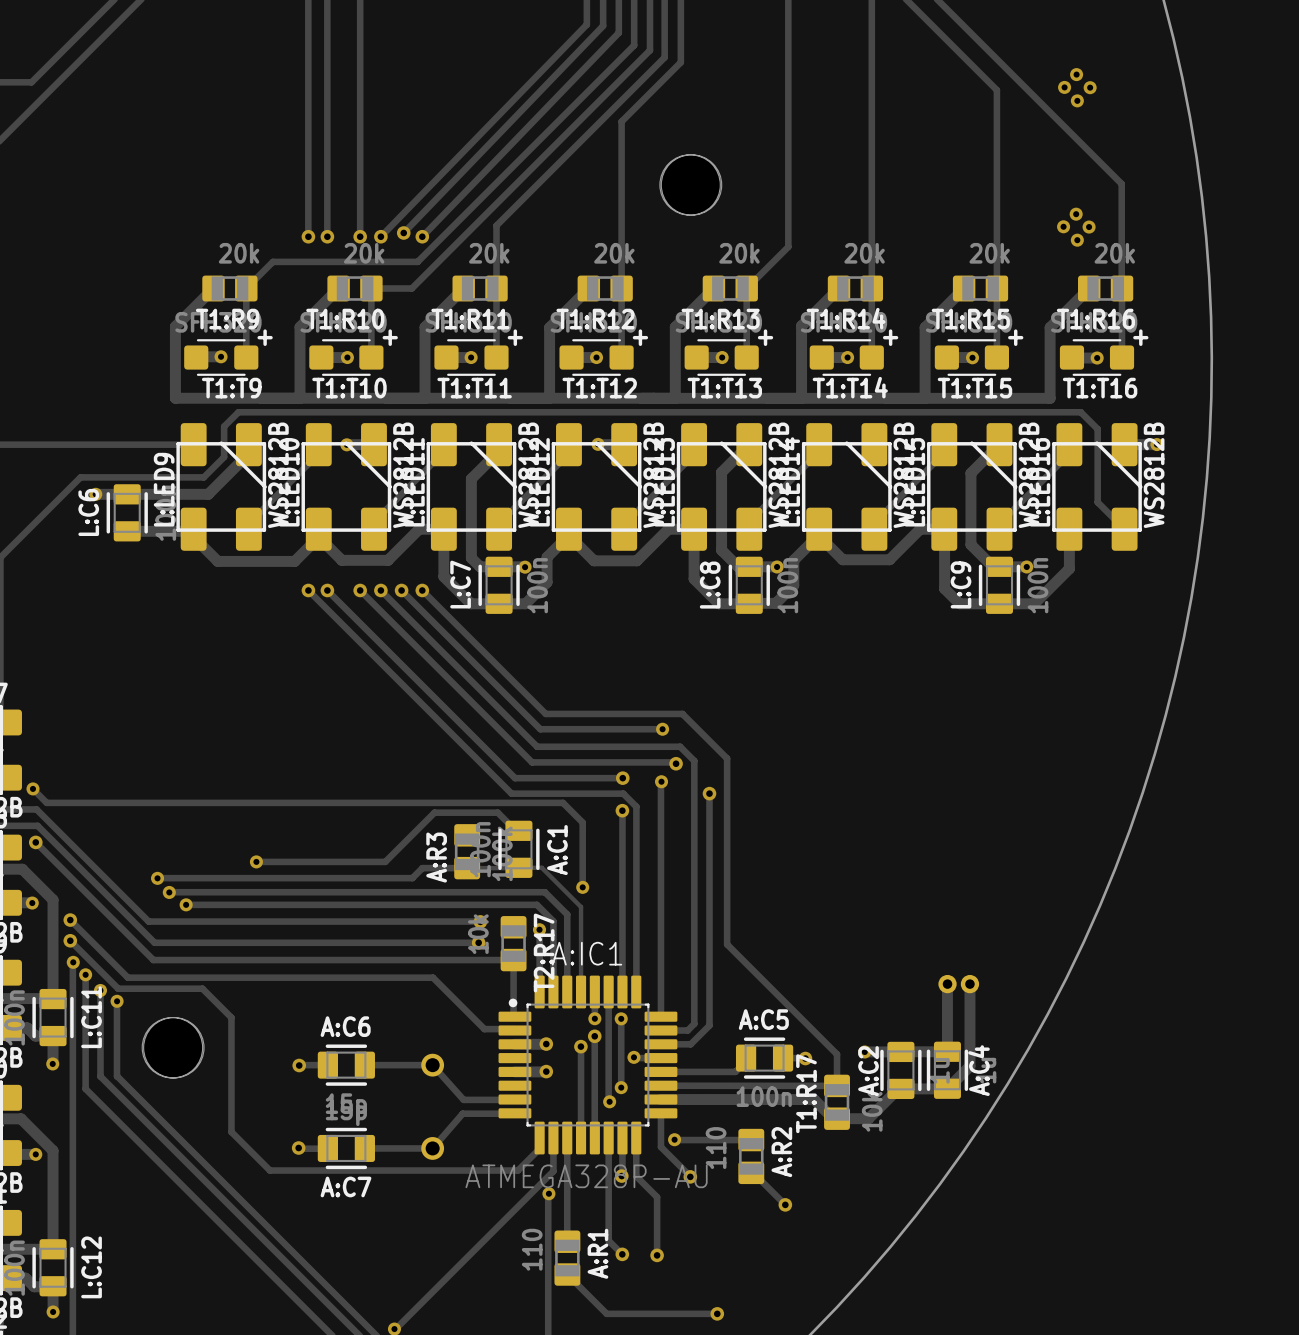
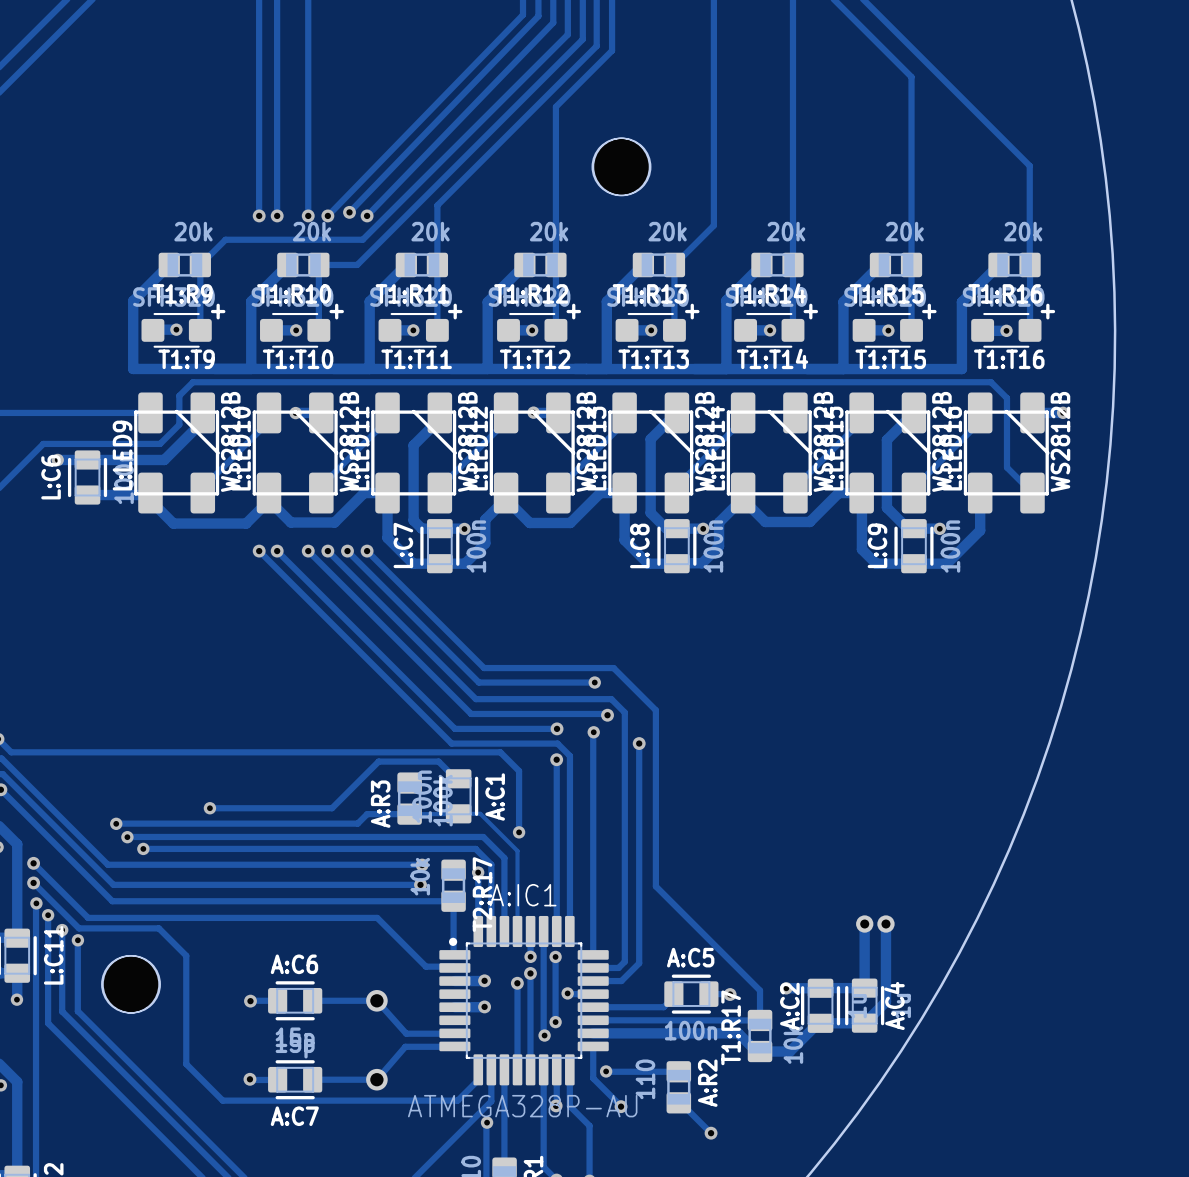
via: (1076, 74) -> none
via: (1064, 87) -> none
via: (1090, 87) -> none
via: (1077, 100) -> none
via: (1076, 214) -> none
via: (1063, 226) -> none
via: (1089, 227) -> none
via: (1077, 240) -> none

